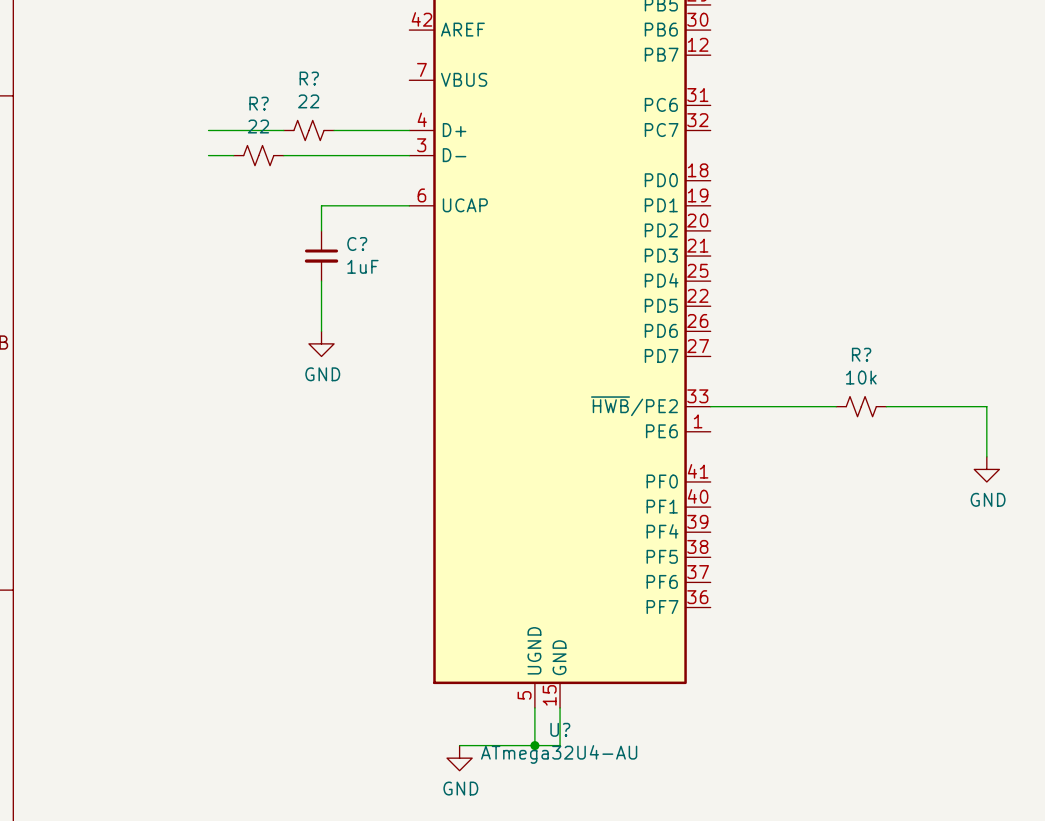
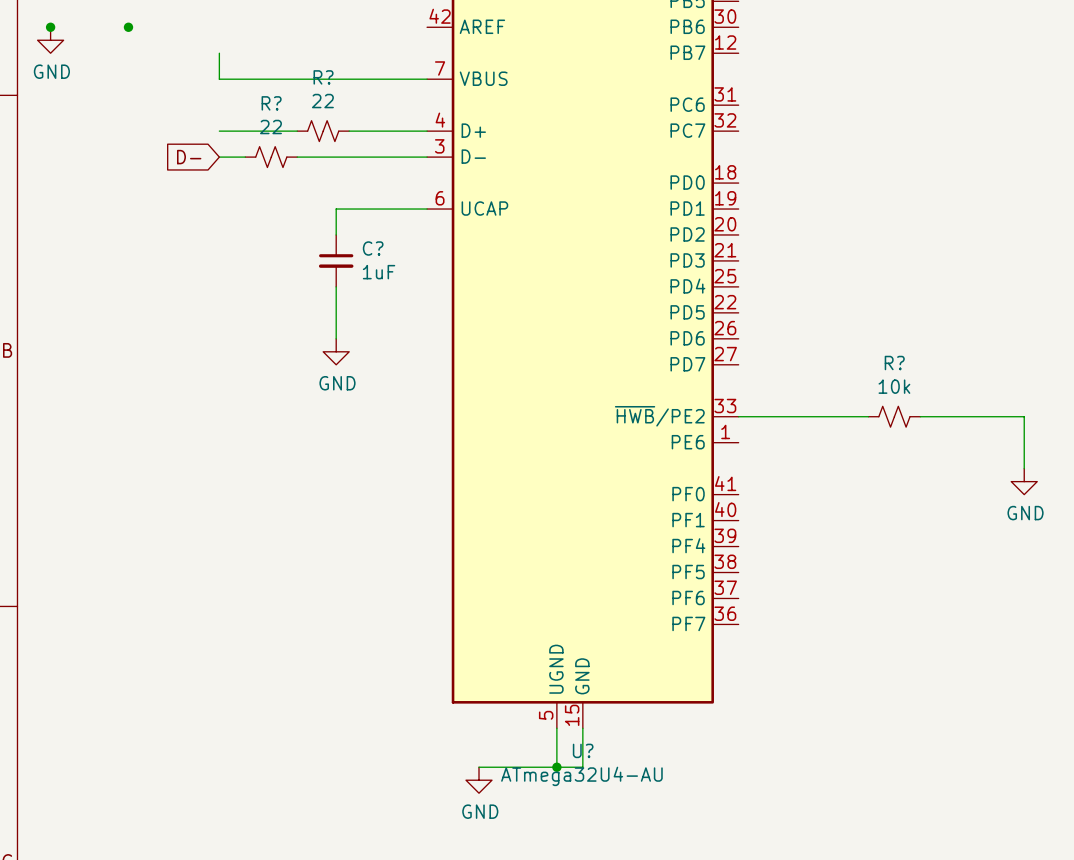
junction: none -> (50, 27)
junction: none -> (128, 27)
power symbol: none -> GND (50, 40)
wire: none -> (219, 53) (219, 79) (427, 79)
global label: none -> D- (189, 157)

